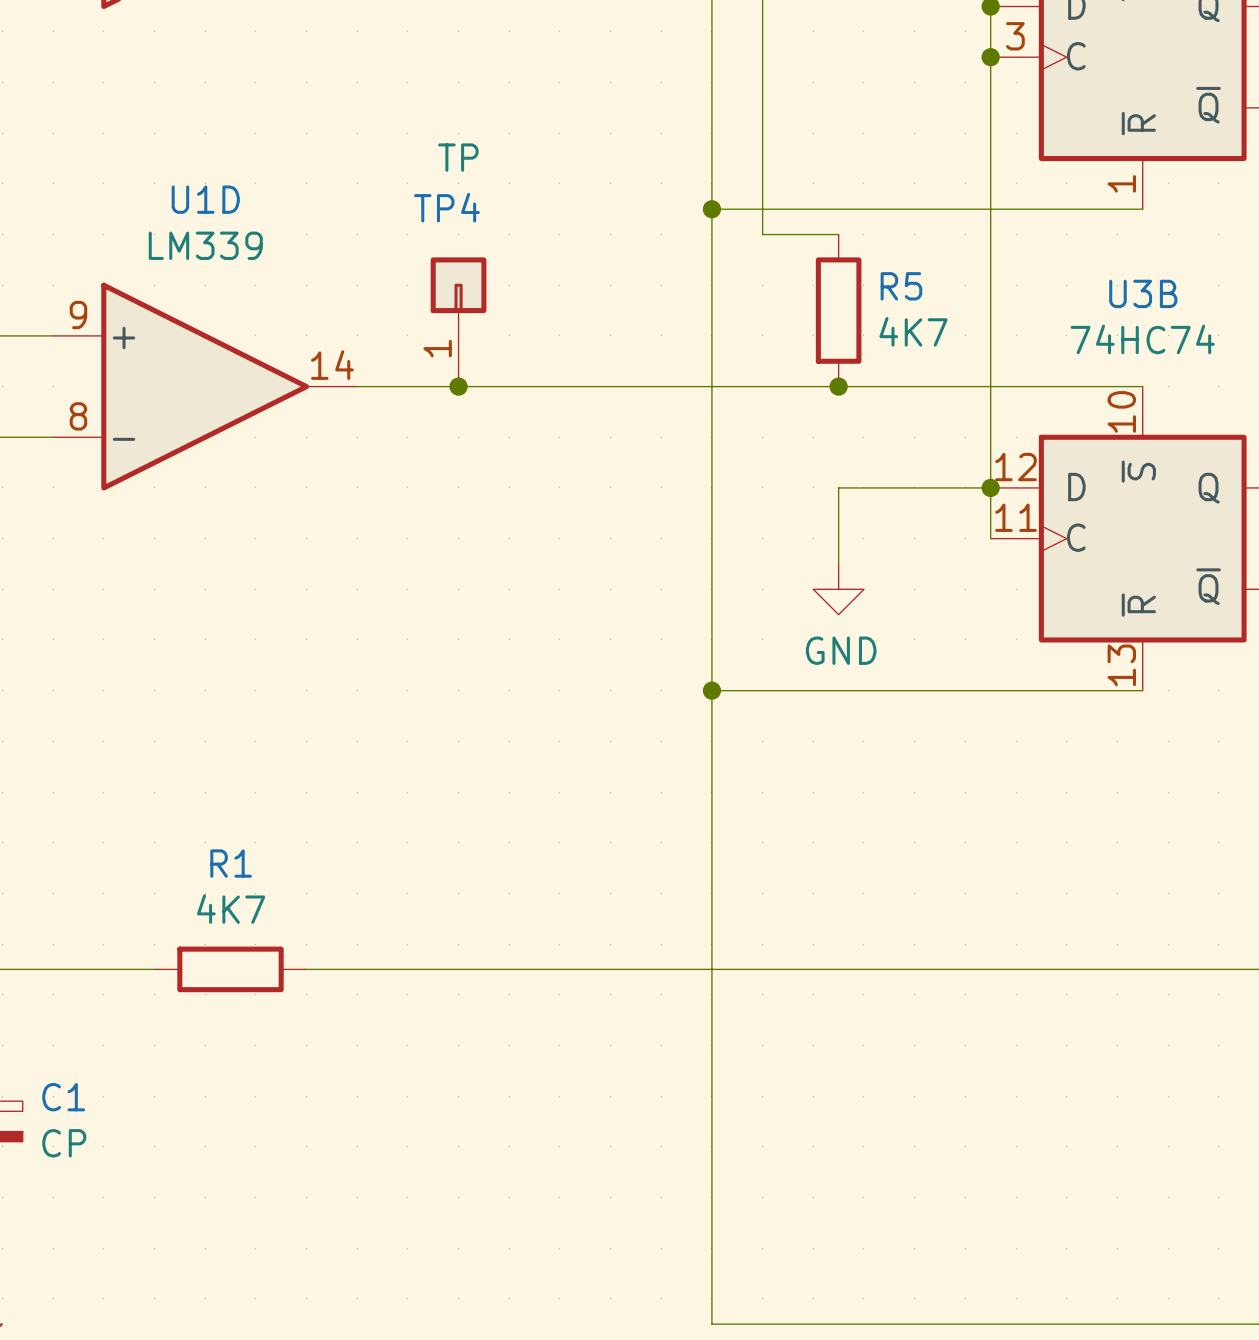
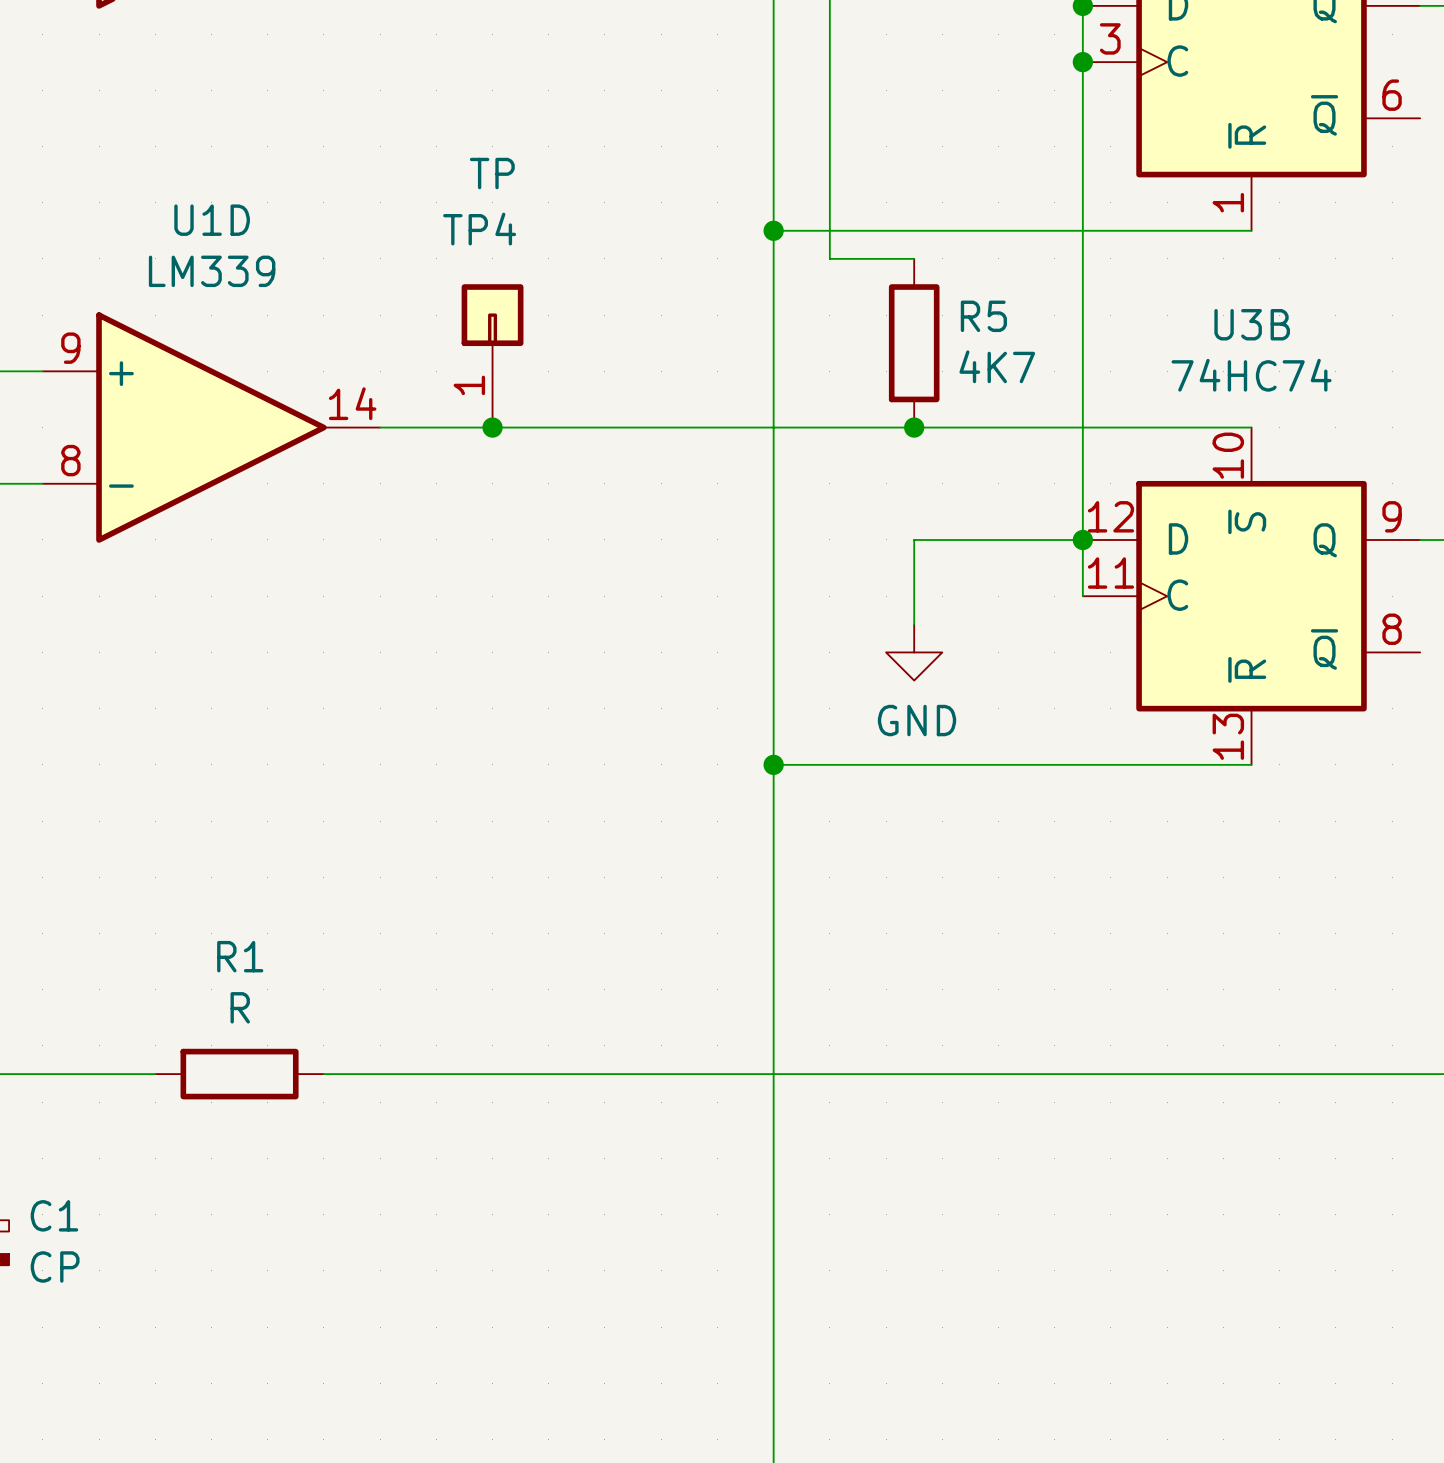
R1 value: 4K7 (231, 909) -> R (240, 1007)

